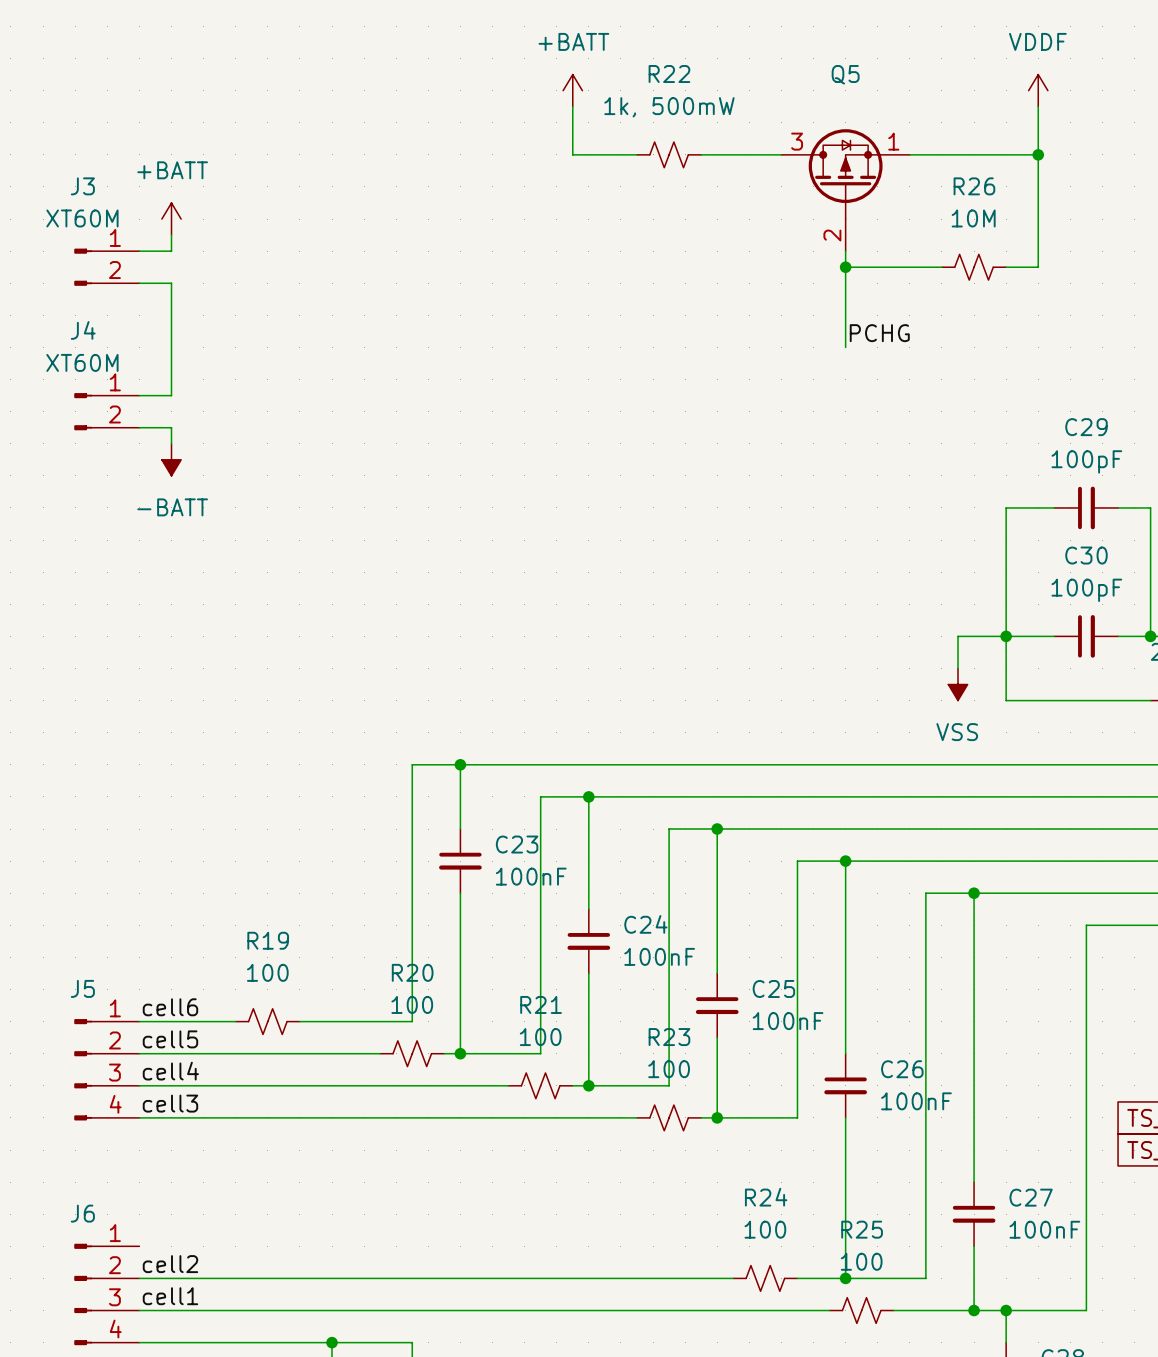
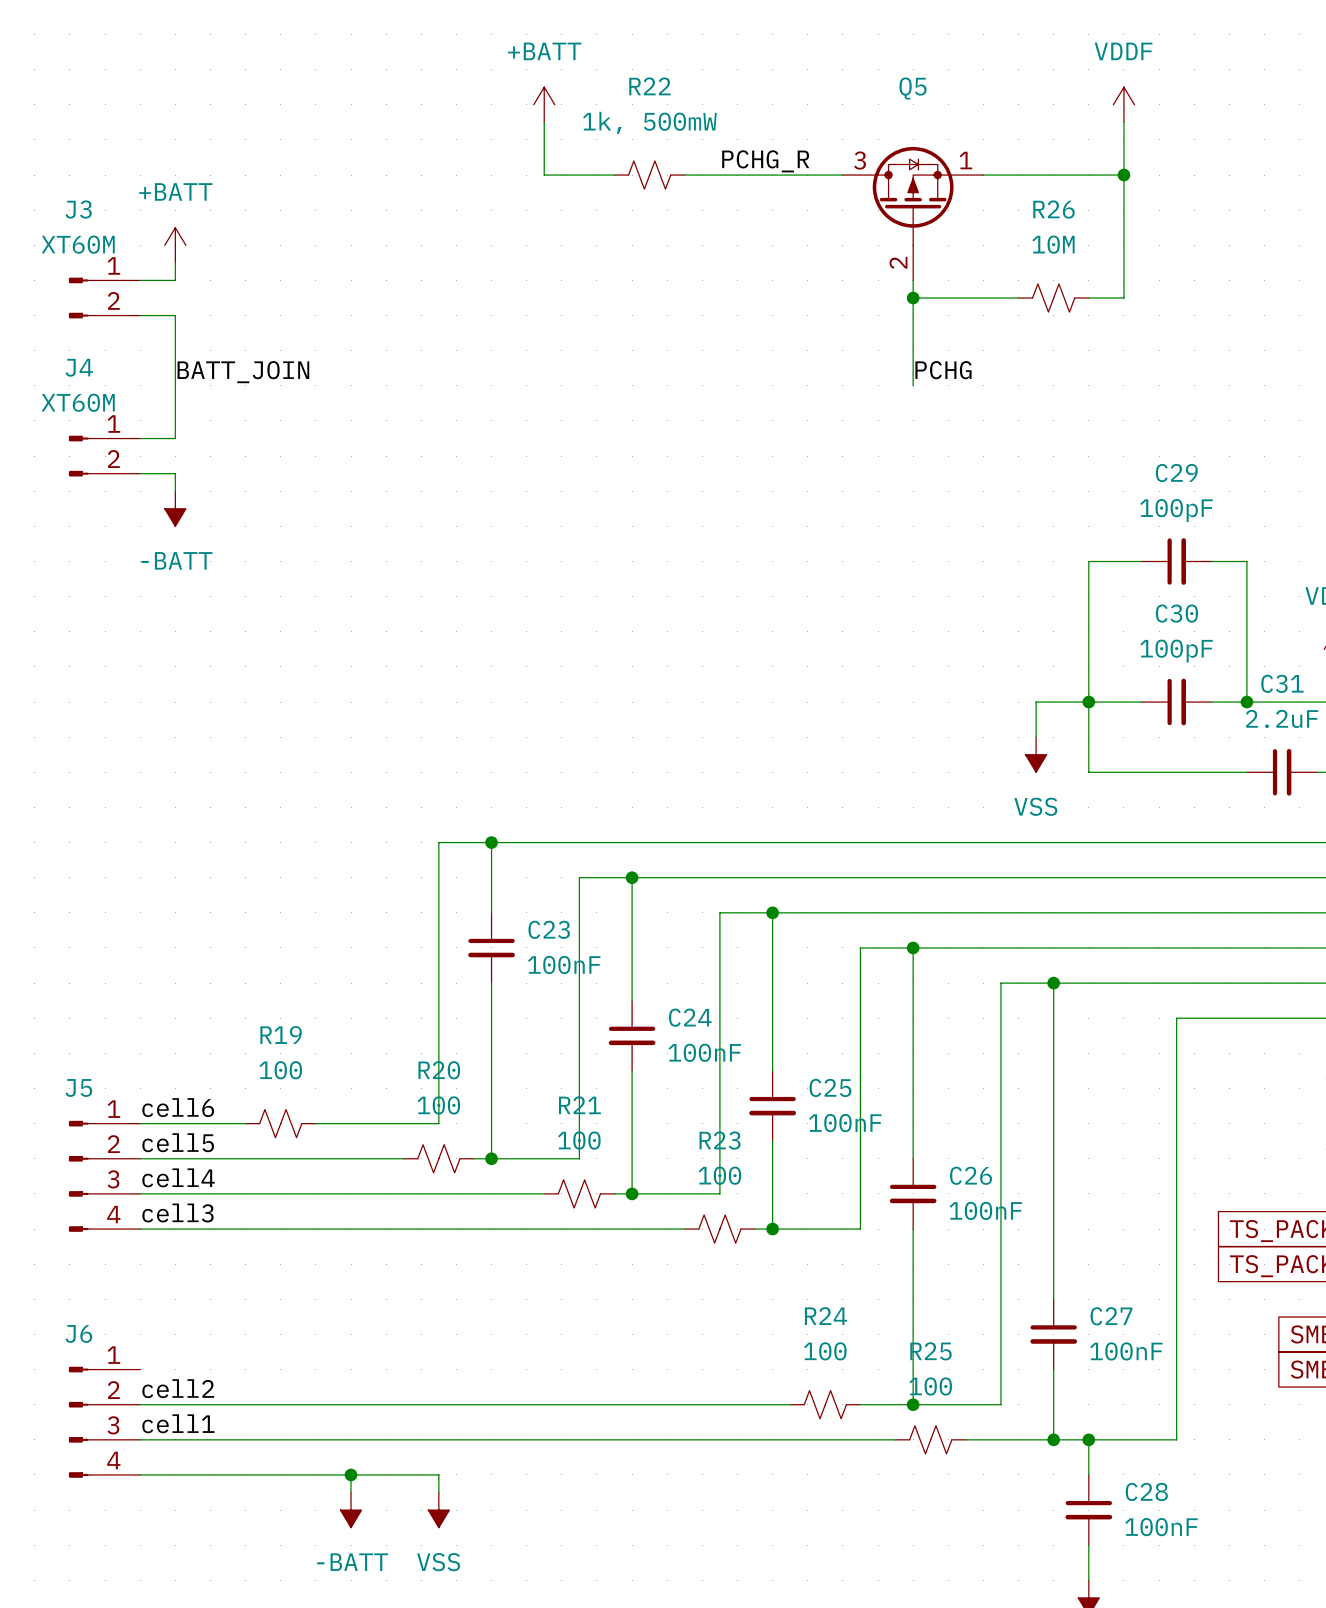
power symbol position: +BATT (572, 90) -> +BATT (544, 104)
wire: none -> (544, 122) (544, 175) (614, 175)
wire: (572, 106) (572, 154) (636, 154) -> (755, 175) (684, 175)
label: none -> PCHG_R (765, 161)
R22 position: (669, 154) -> (649, 175)
label: none -> BATT_JOIN (243, 372)

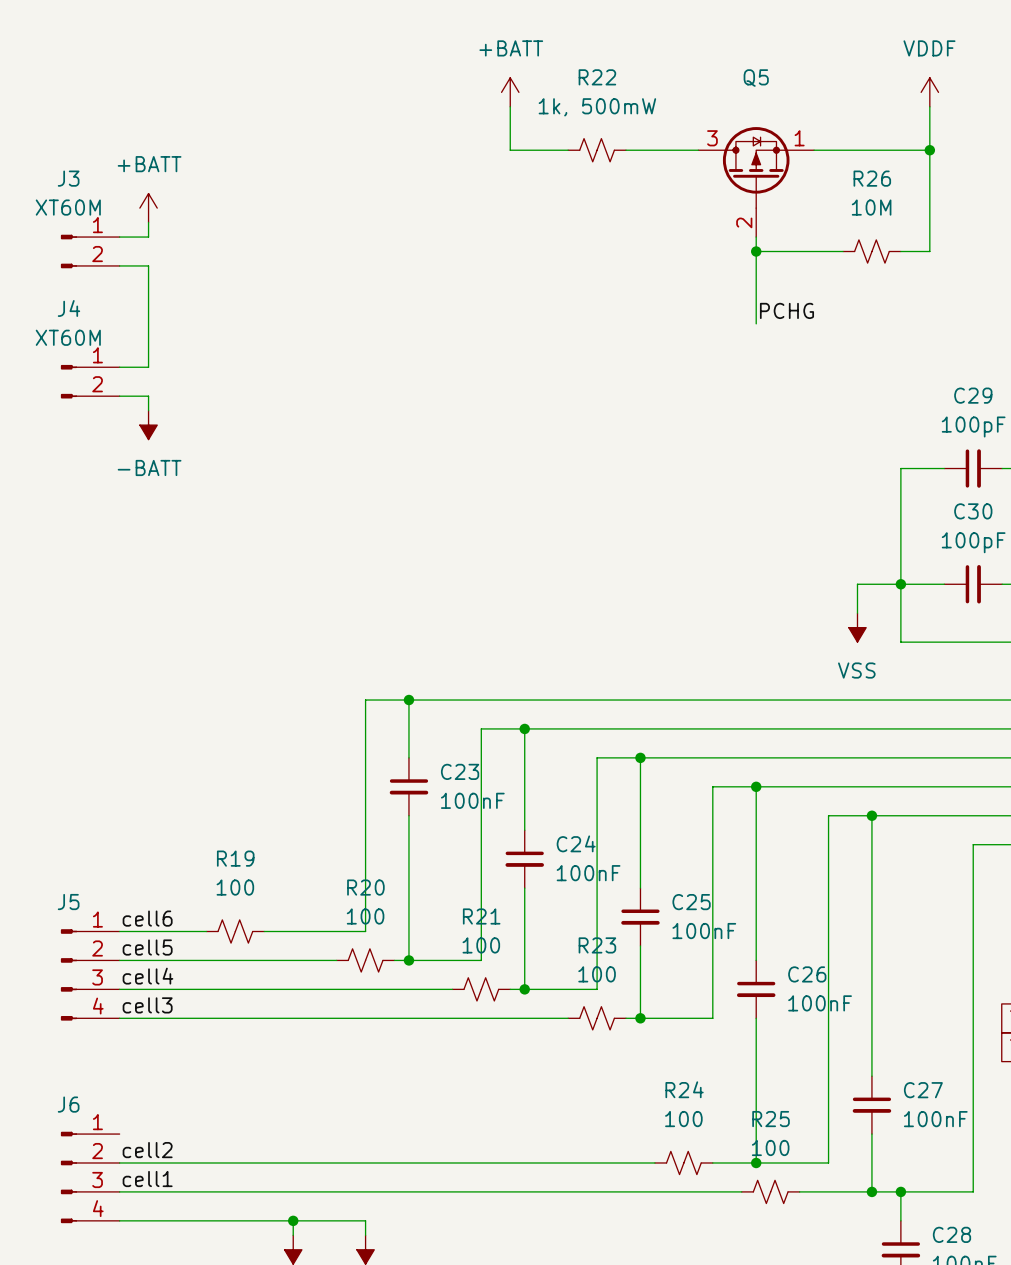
power symbol position: +BATT (544, 104) -> +BATT (510, 92)
wire: (544, 122) (544, 175) (614, 175) -> none
label: PCHG_R (765, 161) -> none
R22 position: (649, 175) -> (597, 150)
wire: (684, 175) (755, 175) -> (568, 150) (510, 150) (510, 106)
label: BATT_JOIN (243, 372) -> none

